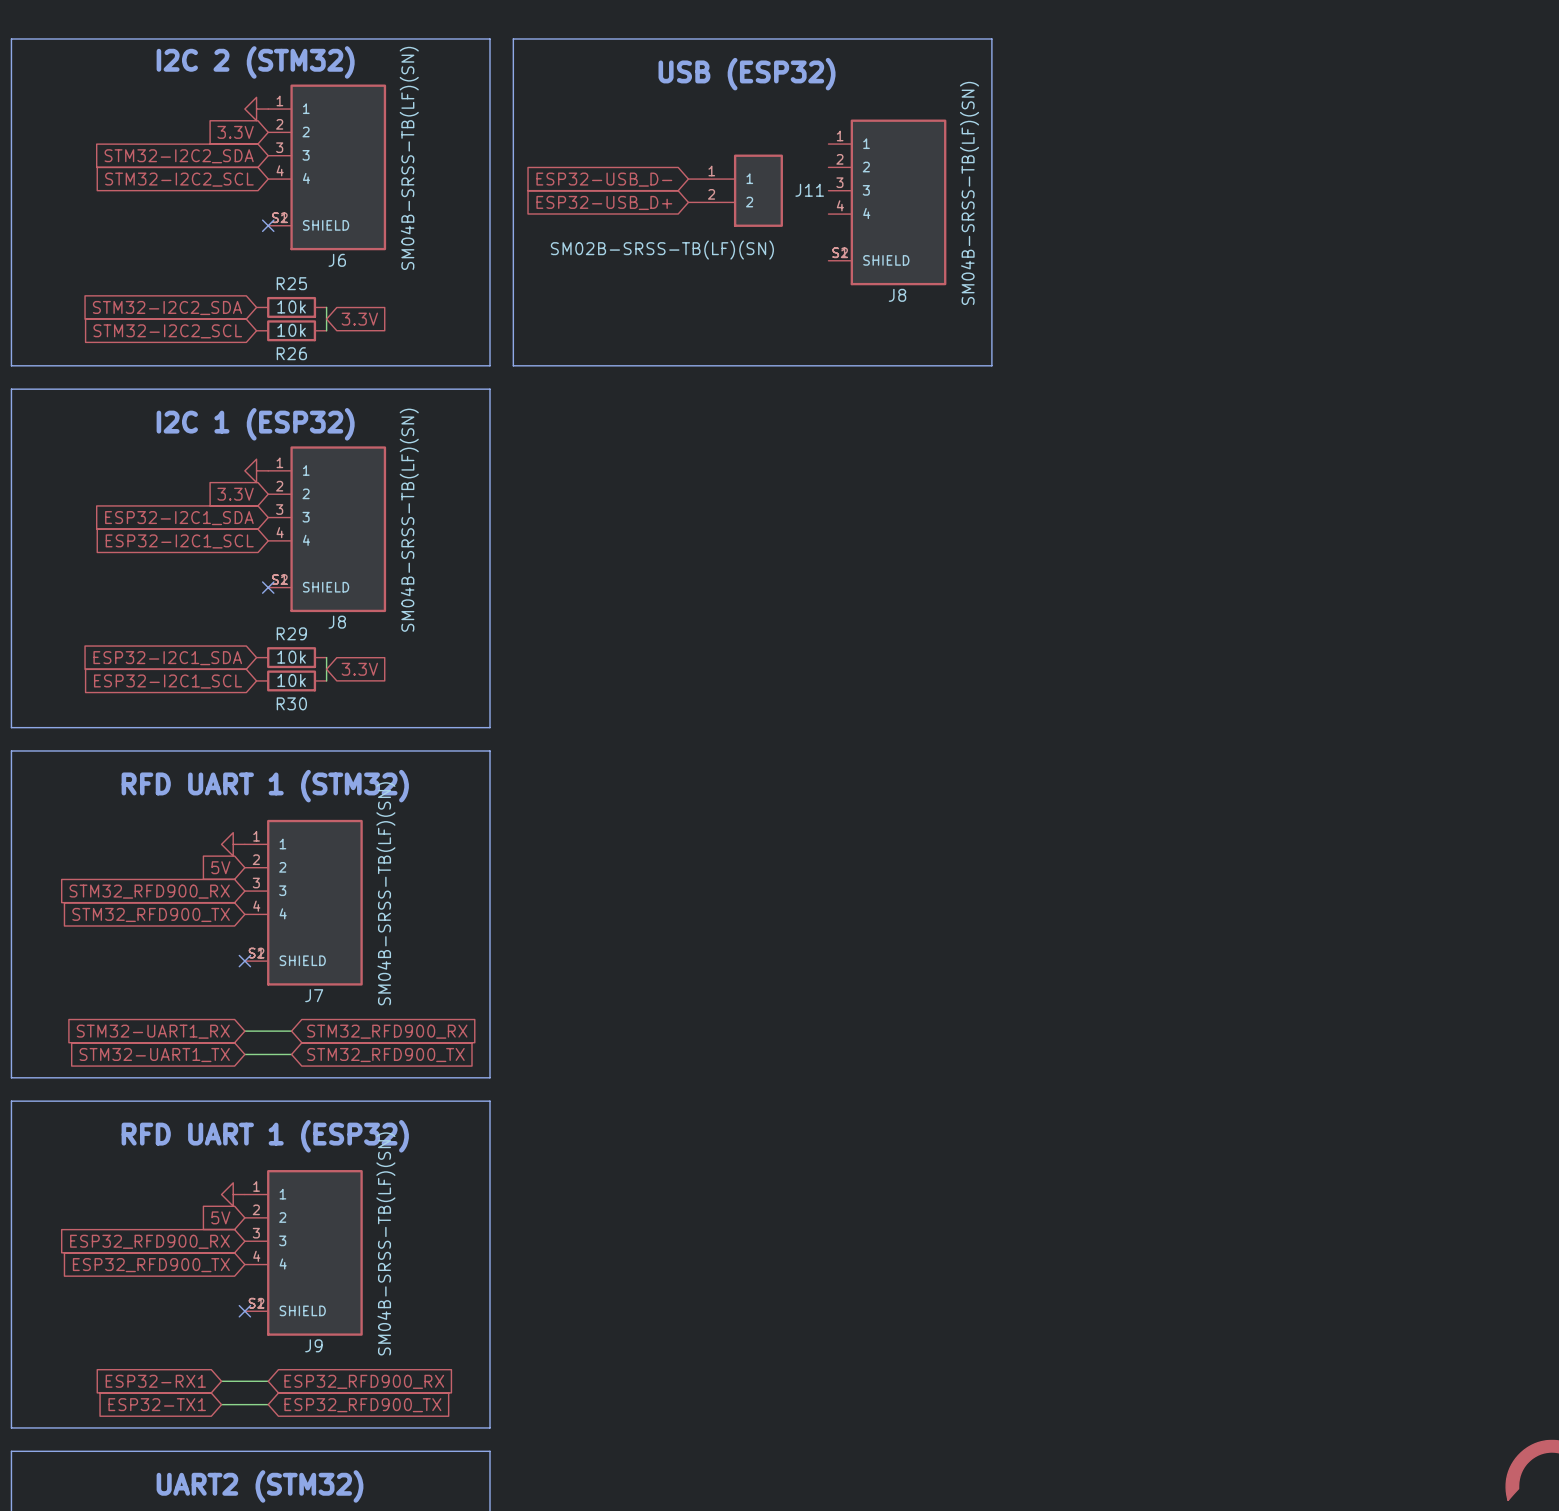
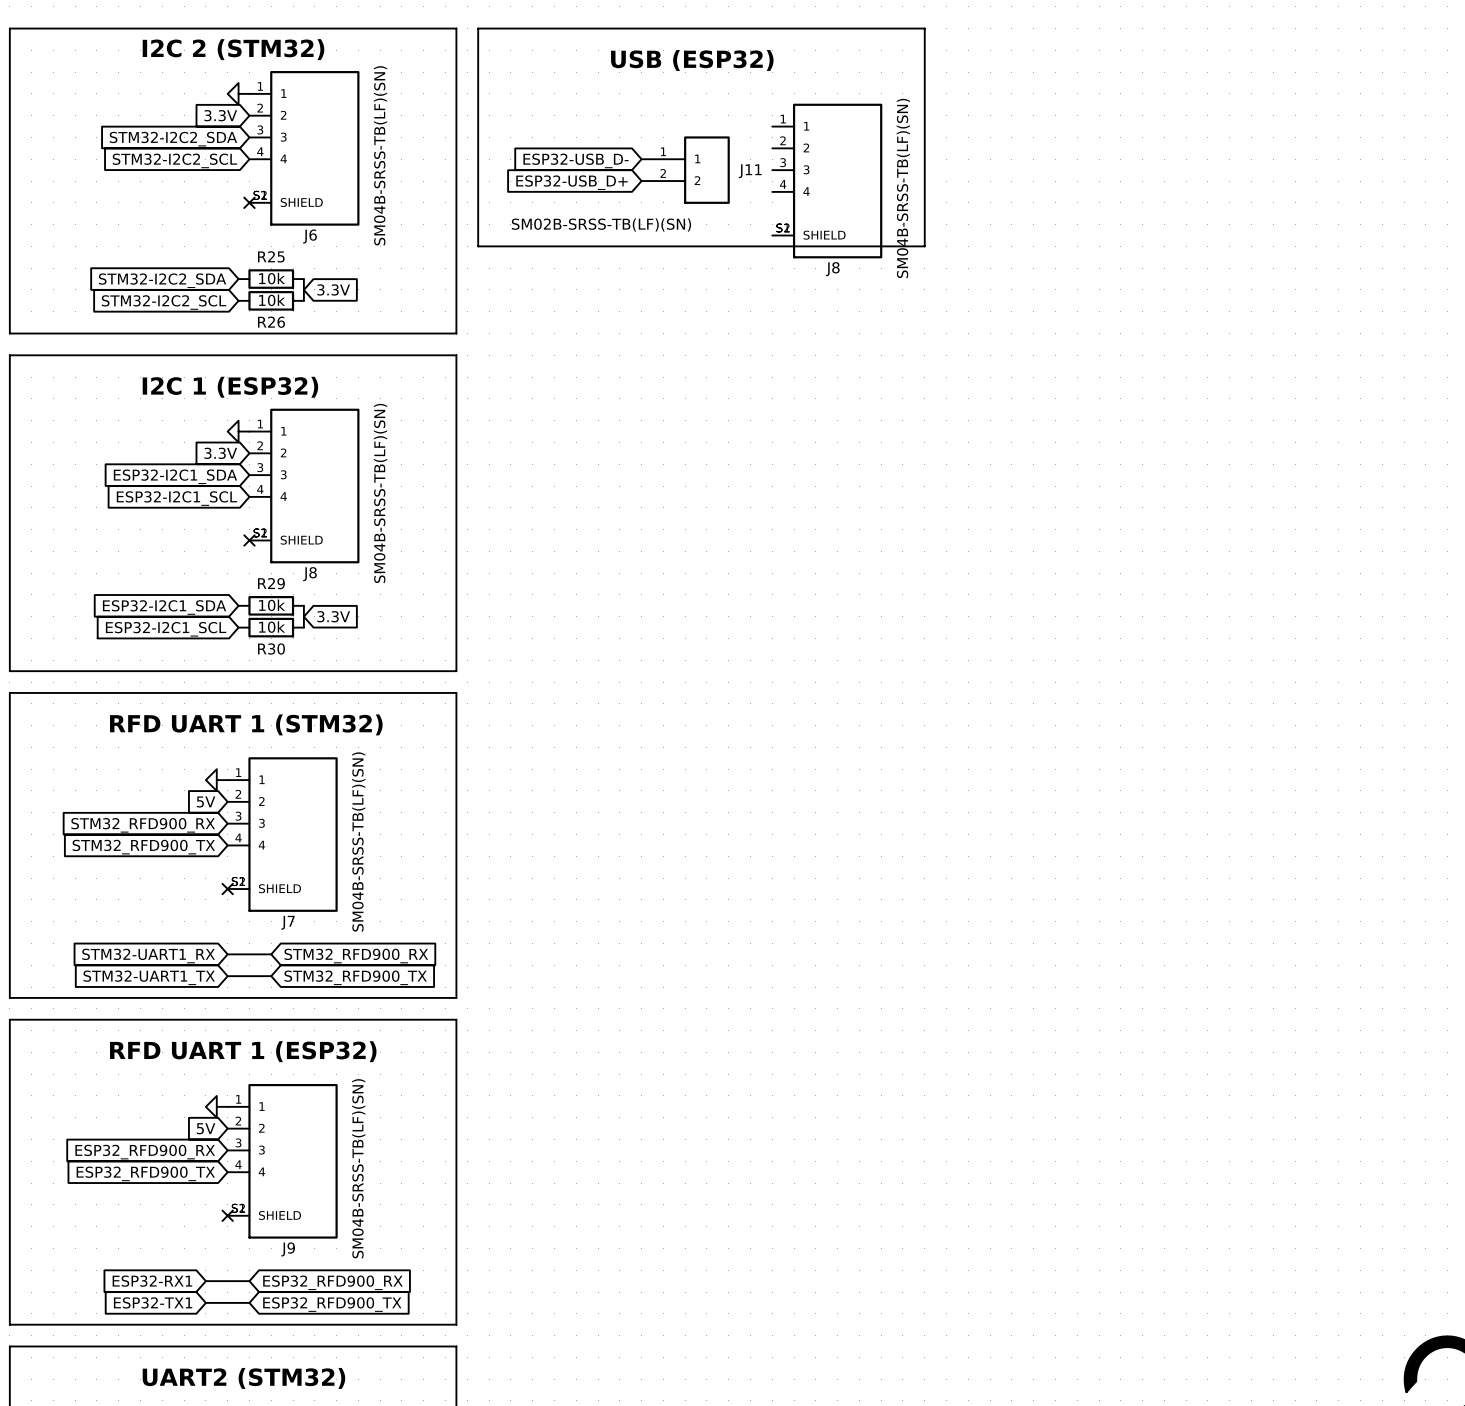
line: (513, 272) (513, 365) (991, 365) (991, 272) -> (478, 246) (924, 246)

